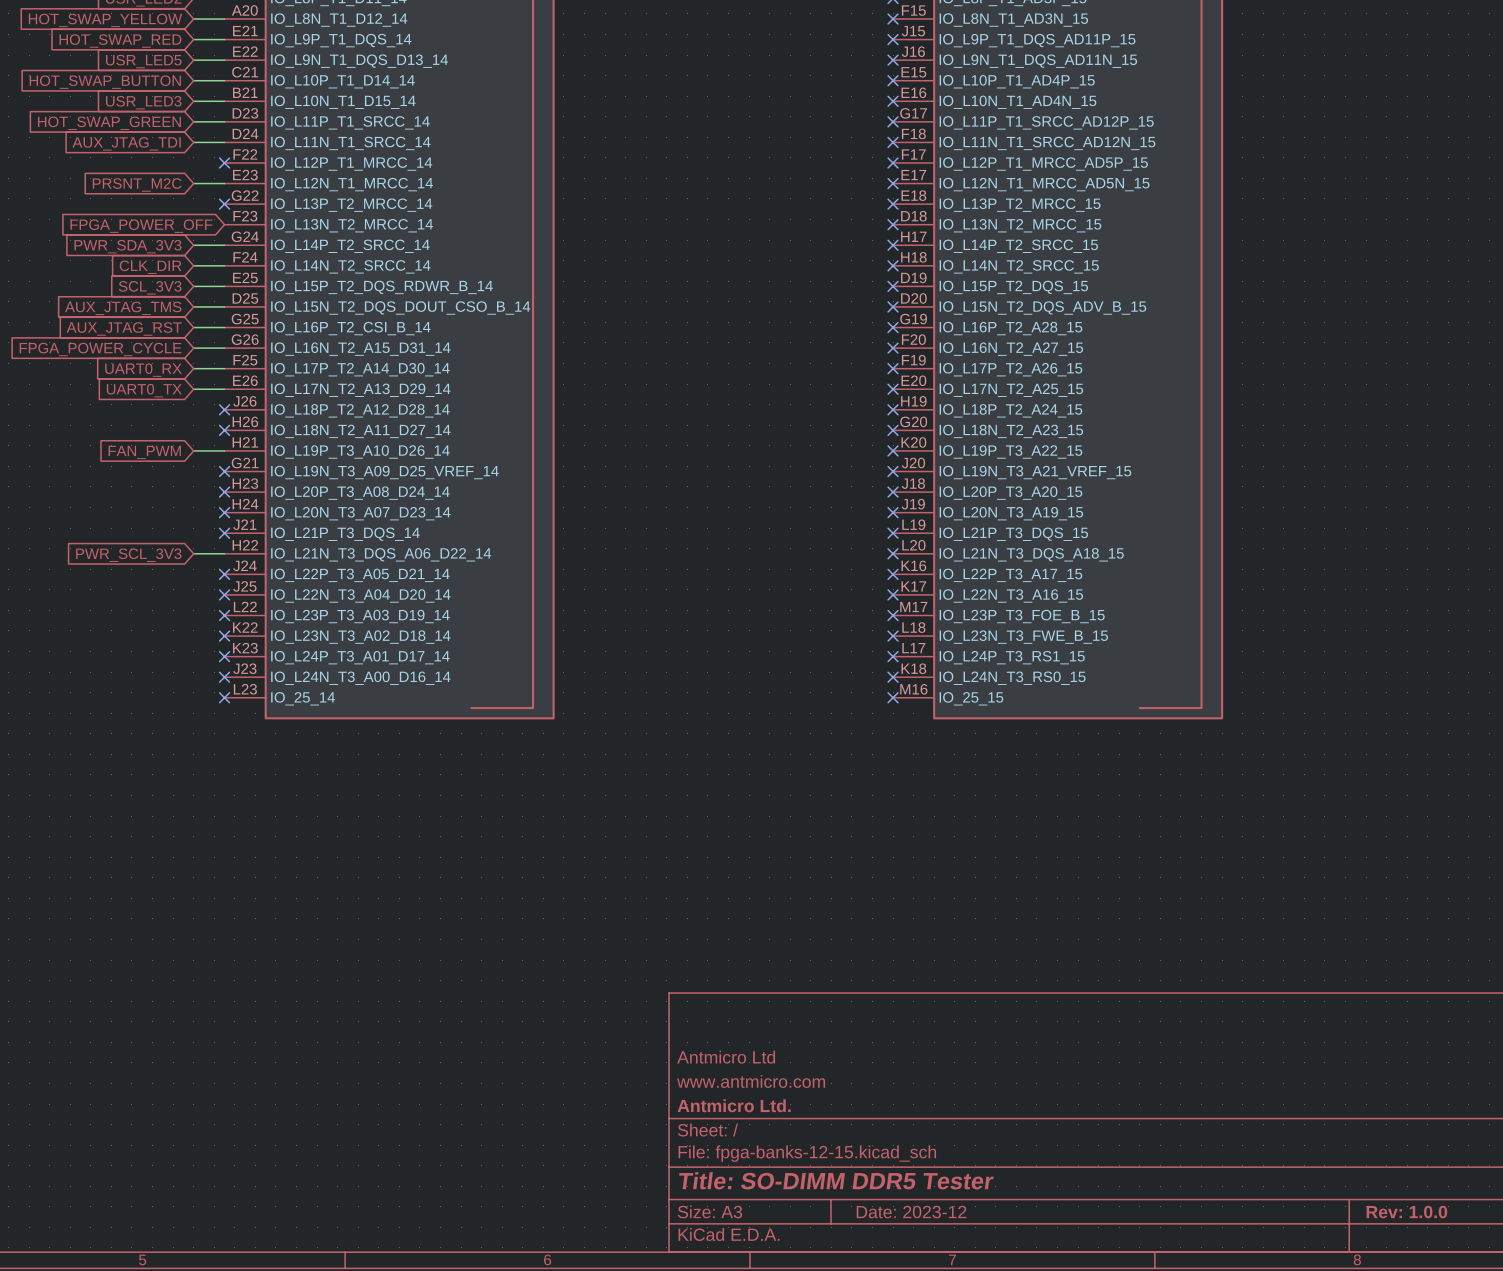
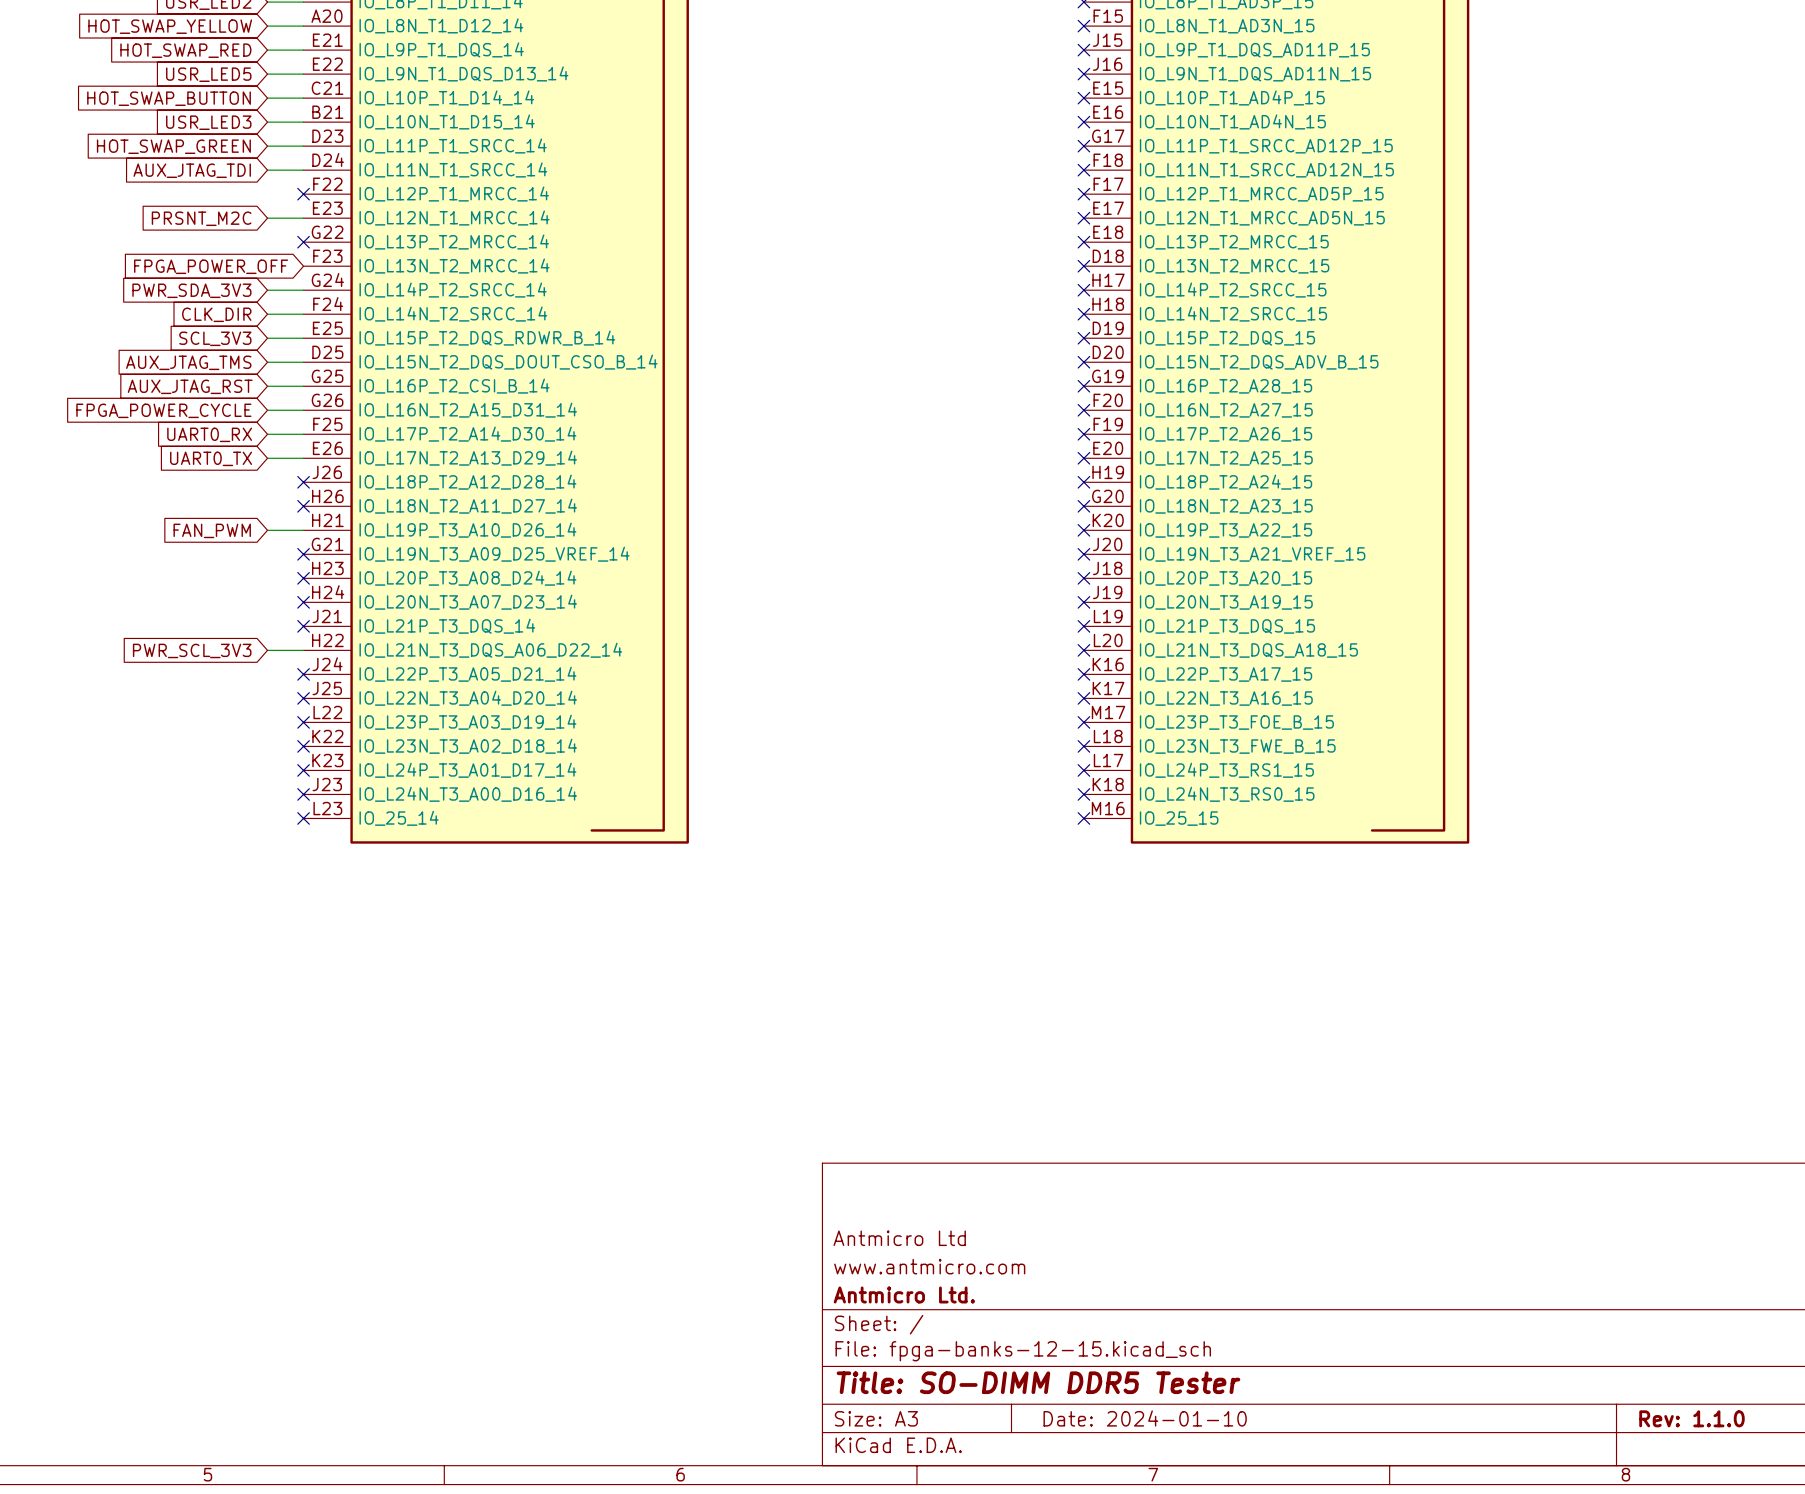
title block: Date: 2023-12 (911, 1212) -> Date: 2024-01-10 (1145, 1418)
title block: Rev: 1.0.0 (1406, 1212) -> Rev: 1.1.0 (1691, 1418)

